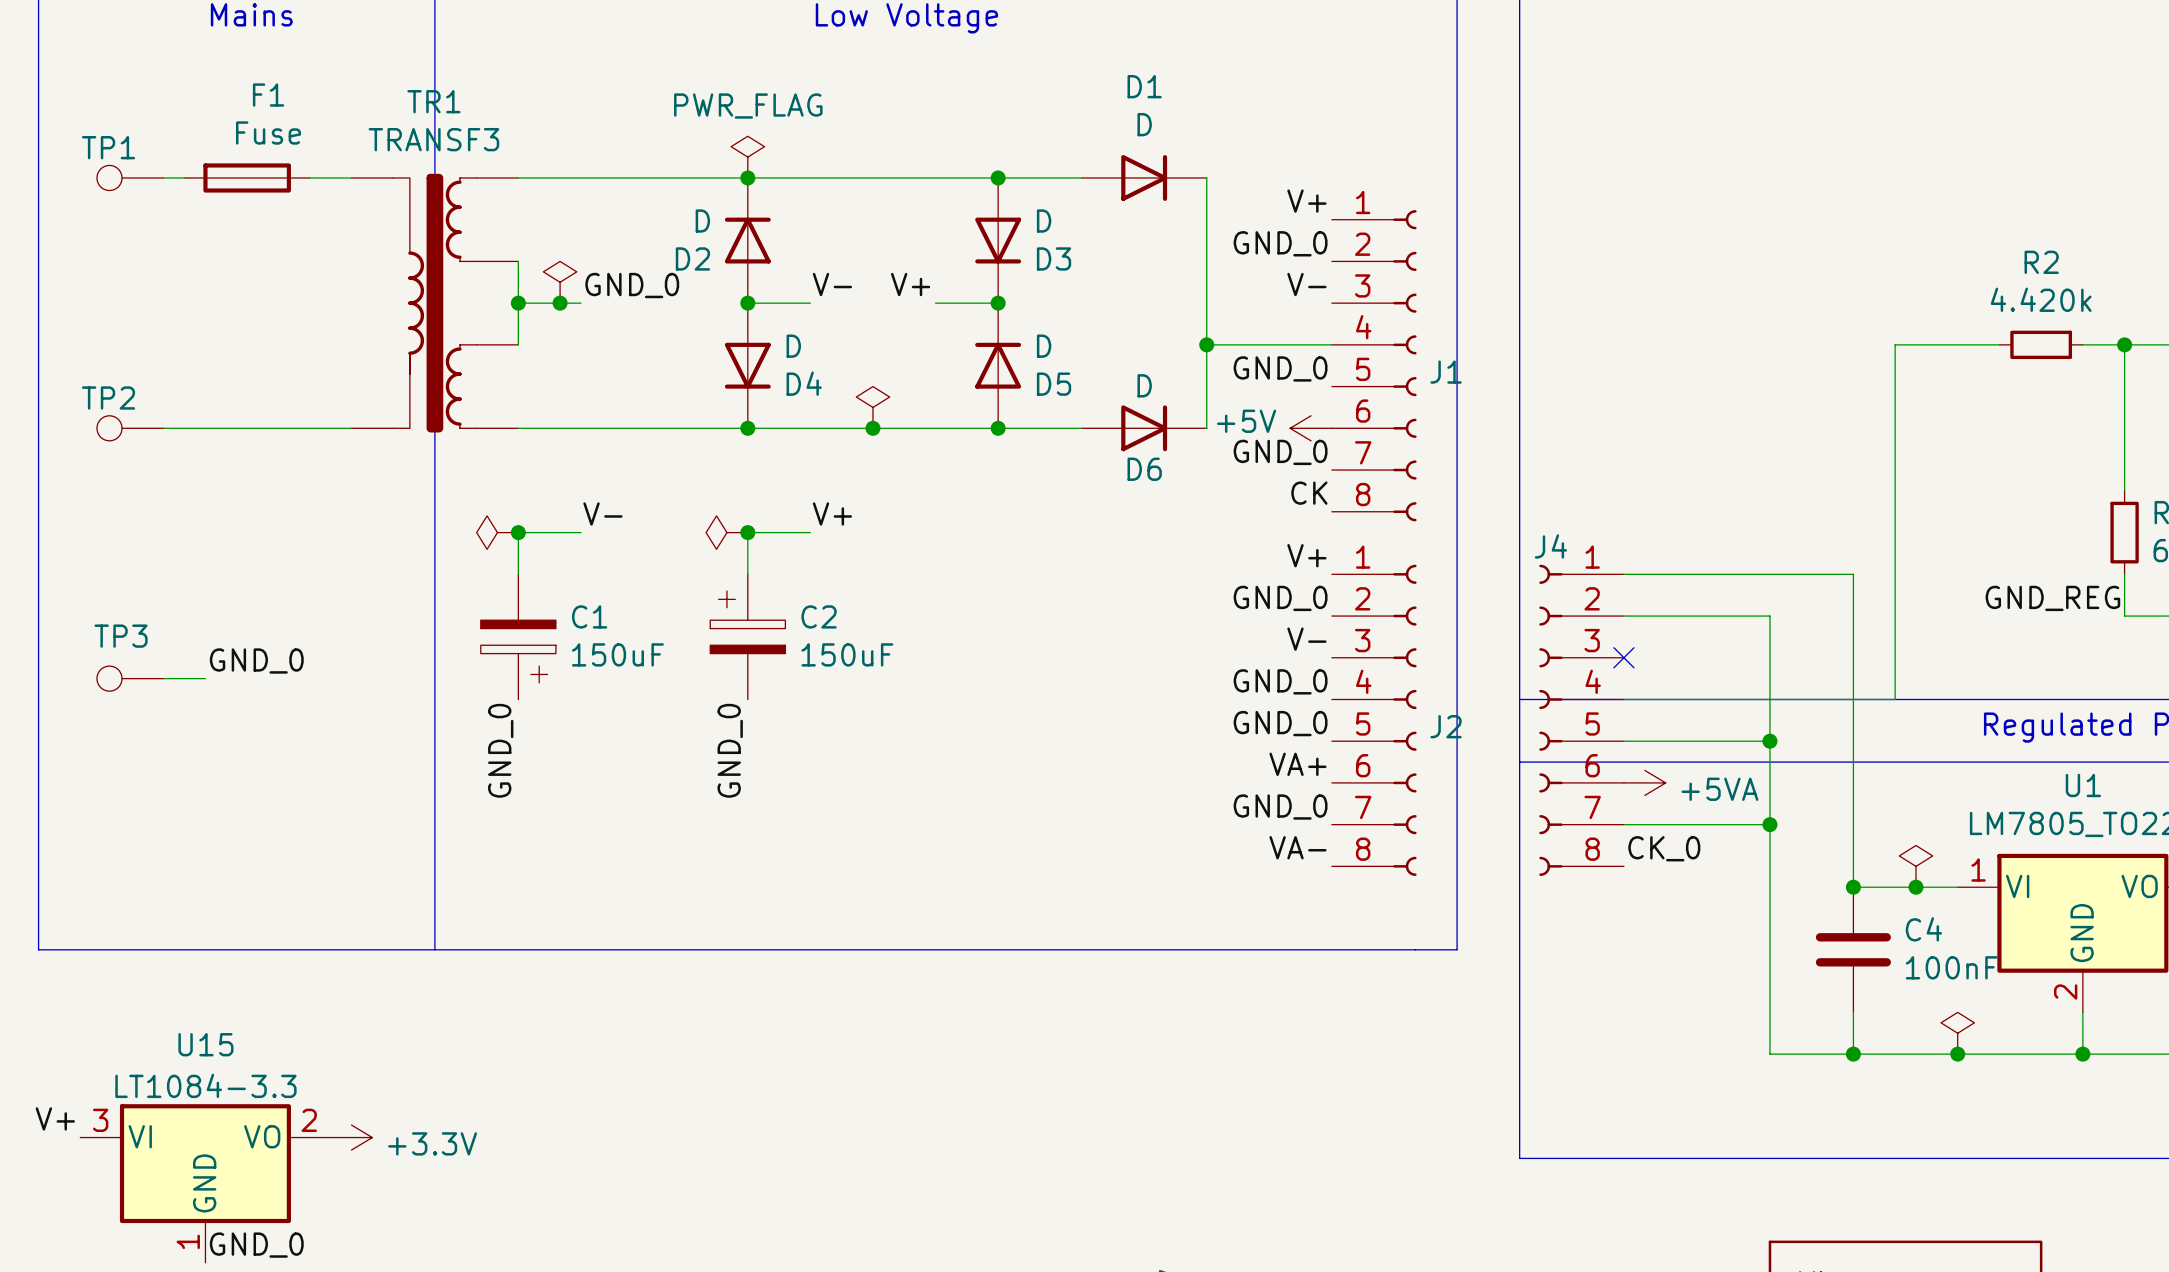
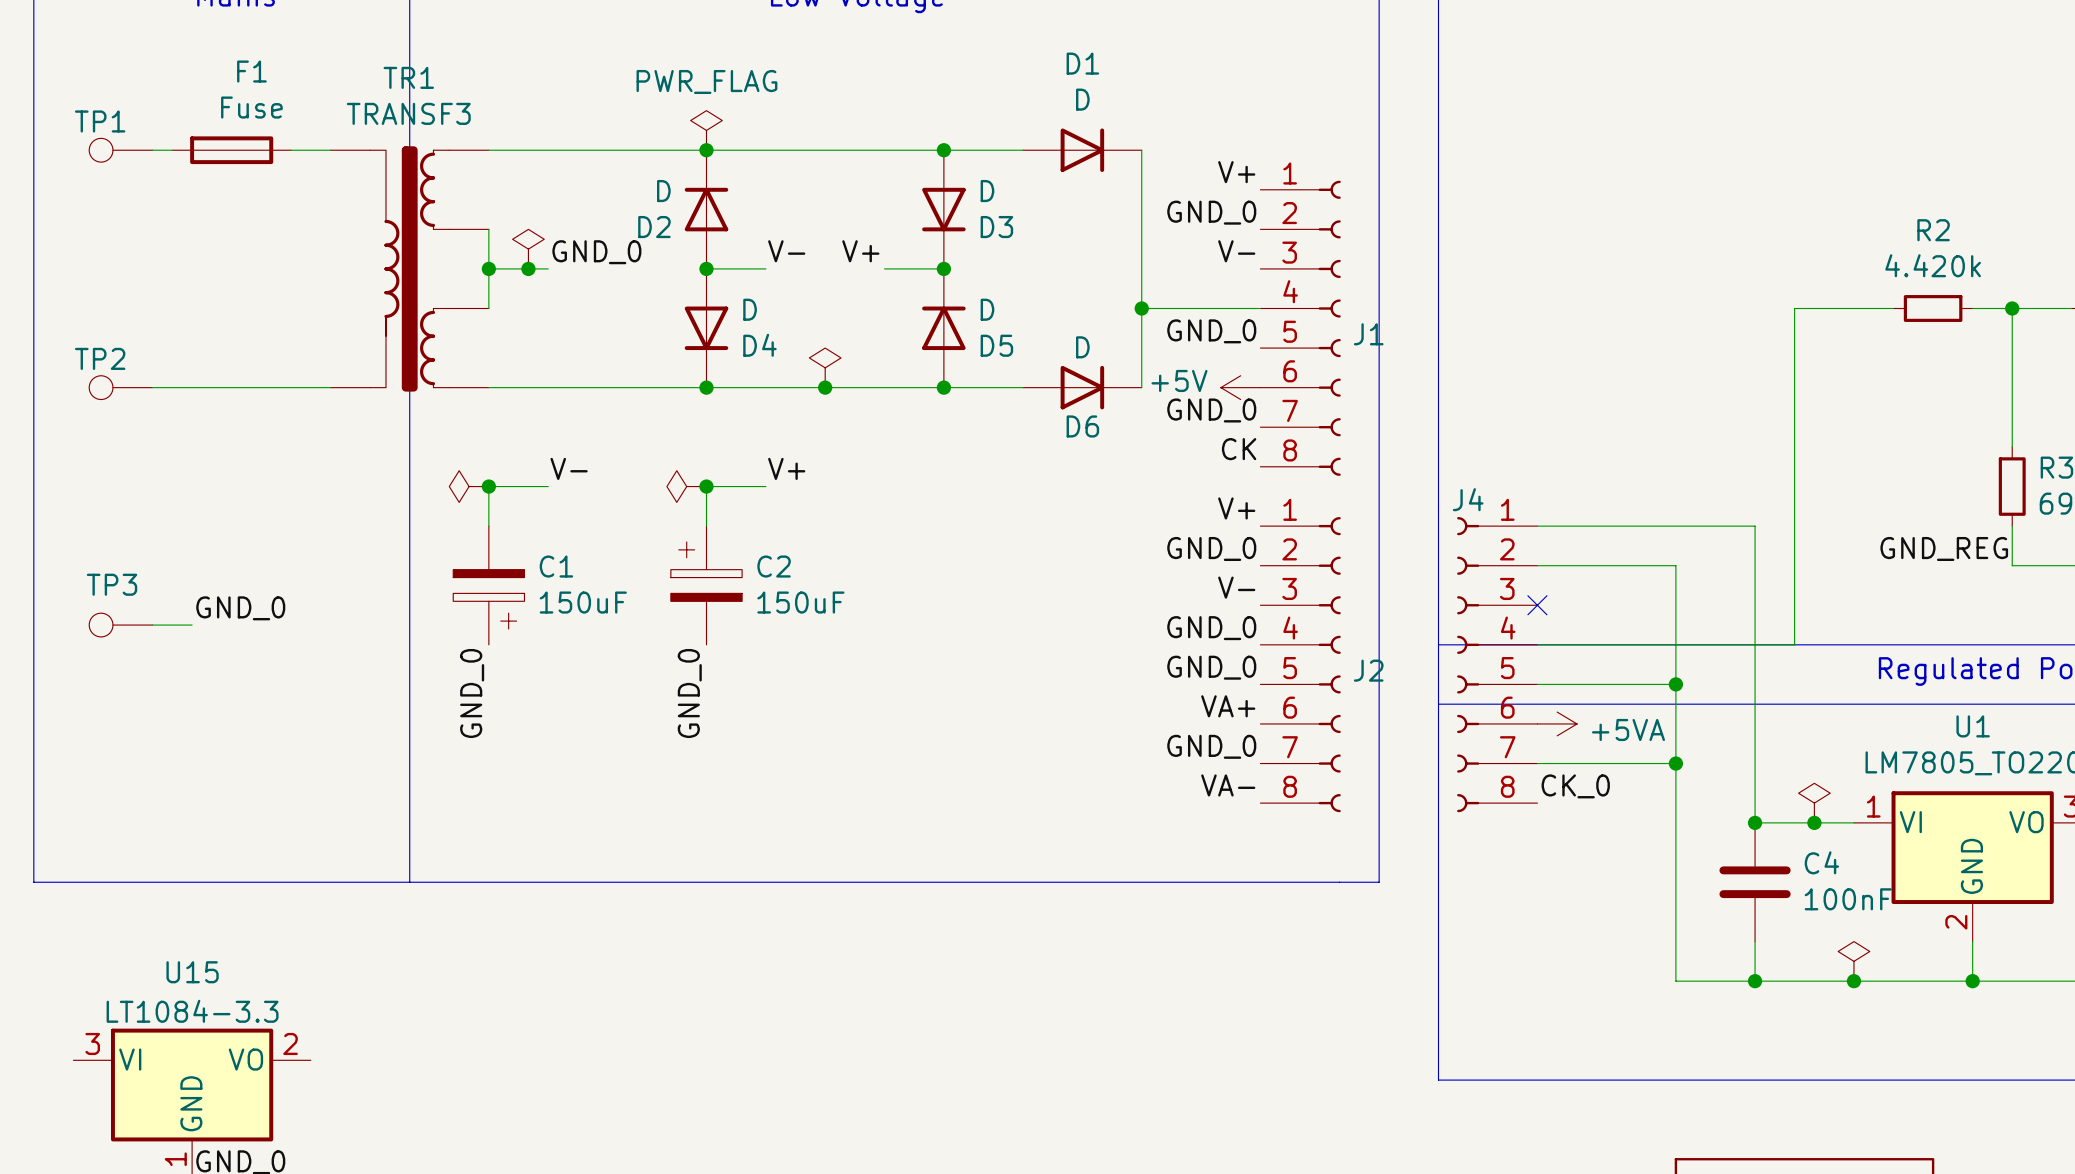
label: V+ (55, 1118) -> none
power symbol: +3.3V (351, 1137) -> none

